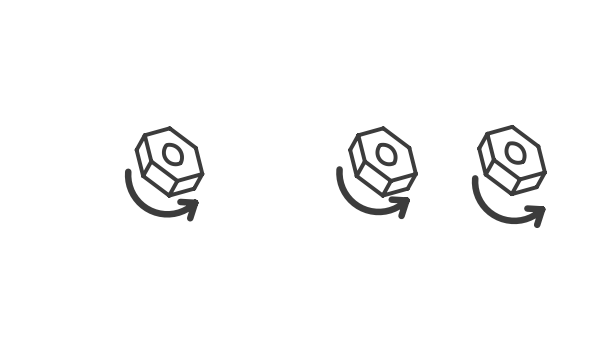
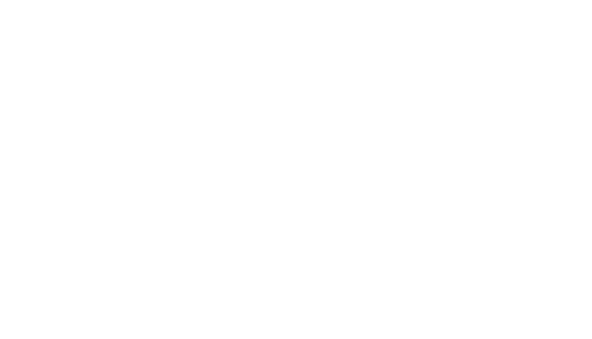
drawing: [471, 124, 547, 229] -> none
drawing: [124, 126, 205, 222] -> none
drawing: [336, 126, 418, 220] -> none

